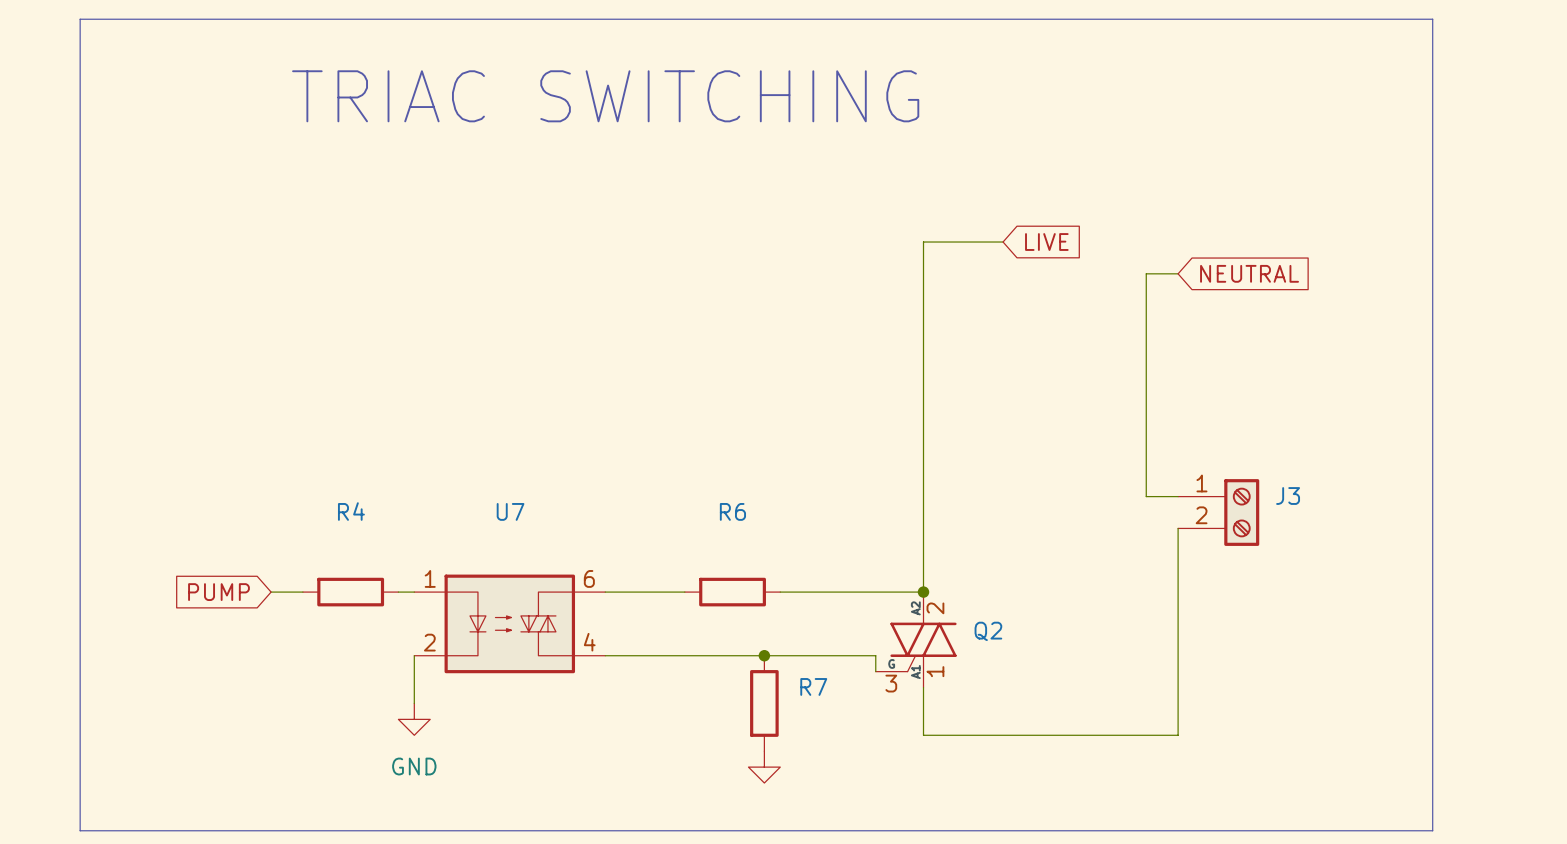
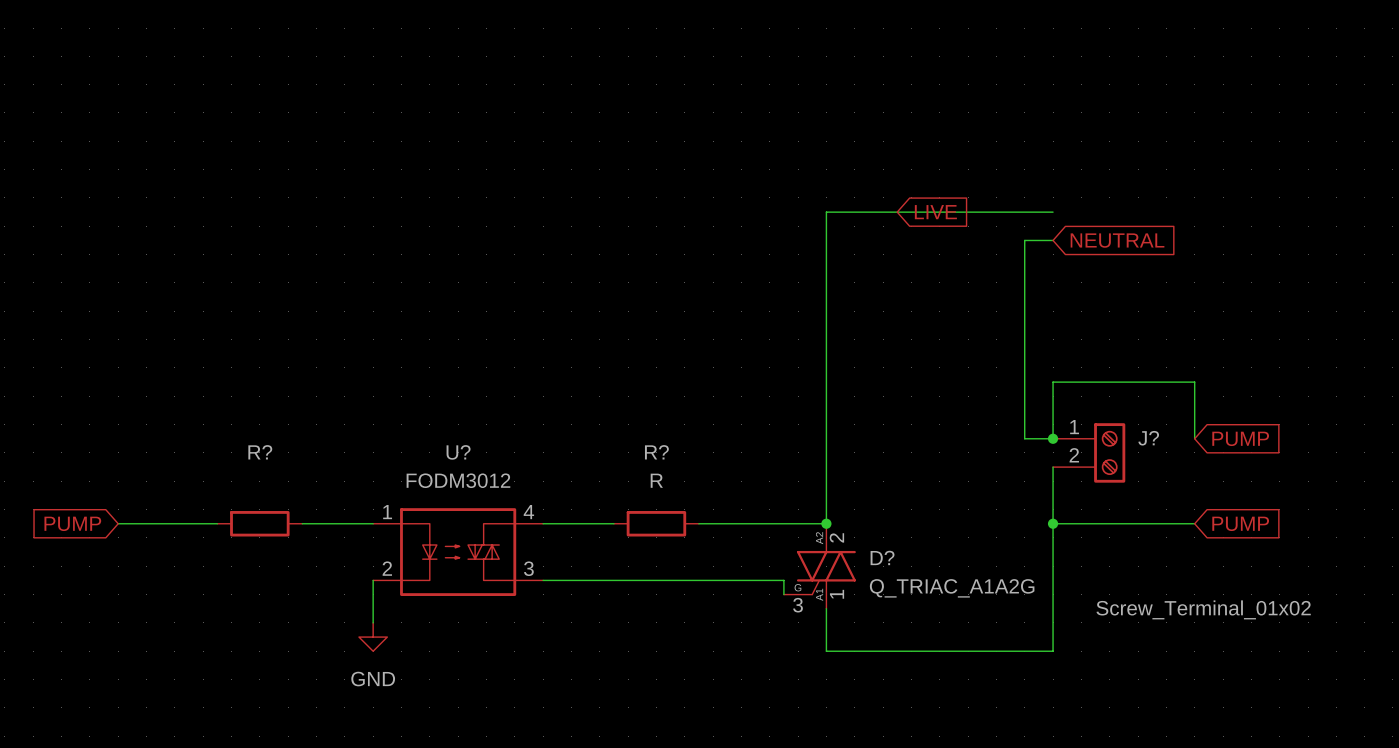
line: (80, 19) (80, 830) (1432, 830) (1432, 19) (80, 19) -> none
text: TRIAC SWITCHING (605, 96) -> none
wire: none -> (897, 212) (1053, 212)
wire: none -> (1053, 438) (1053, 382) (1194, 382) (1194, 438)
junction: none -> (1053, 438)
J3 name: J3 (1288, 496) -> J? (1148, 438)
global label: none -> PUMP (1240, 438)
U7 name: U7 (510, 511) -> U? (458, 452)
R6 name: R6 (732, 511) -> R? (656, 452)
U7 value: none -> FODM3012 (458, 480)
R6 value: none -> R (656, 480)
U7 pin number: 6 (589, 578) -> 4 (528, 512)
wire: none -> (118, 523) (217, 523)
global label position: PUMP (218, 592) -> PUMP (72, 523)
wire: (271, 592) (302, 592) -> none
R?: none -> (259, 523)
wire: none -> (302, 523) (358, 523)
R4: (350, 592) -> none
wire: none -> (1053, 523) (1194, 523)
junction: none -> (1053, 523)
global label: none -> PUMP (1240, 523)
Q2 name: Q2 (988, 631) -> D? (882, 557)
U7 pin number: 4 (589, 642) -> 3 (528, 568)
junction: (764, 655) -> none
Q2 value: none -> Q_TRIAC_A1A2G (952, 588)
J3 value: none -> Screw_Terminal_01x02 (1203, 609)
R7: (764, 703) -> none
power symbol: (764, 767) -> none

